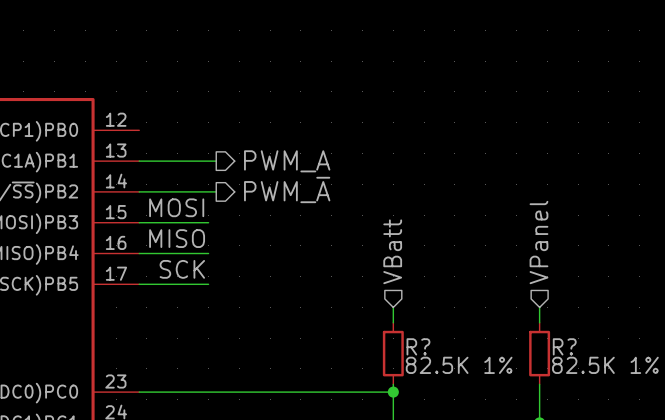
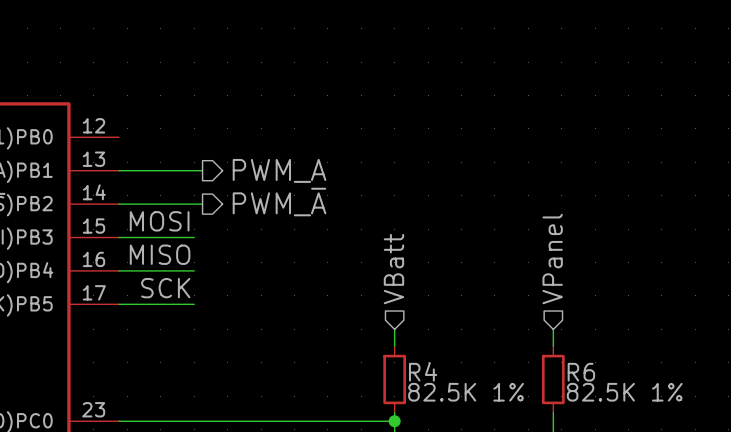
R? name: R? (418, 346) -> R4 (423, 371)
R? name: R? (564, 346) -> R6 (581, 372)

